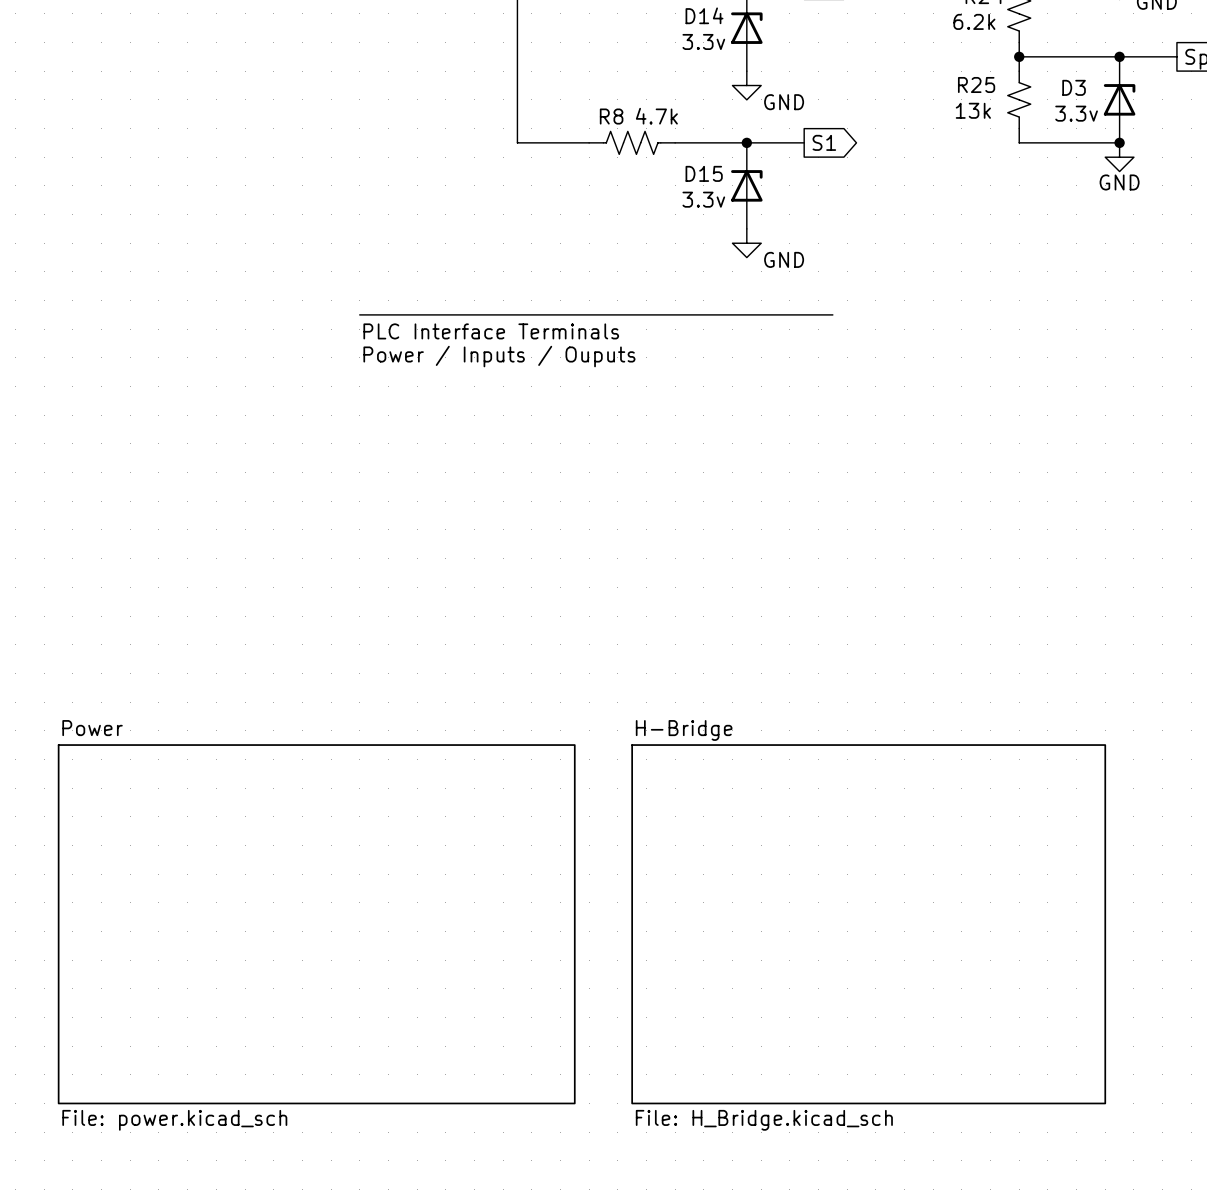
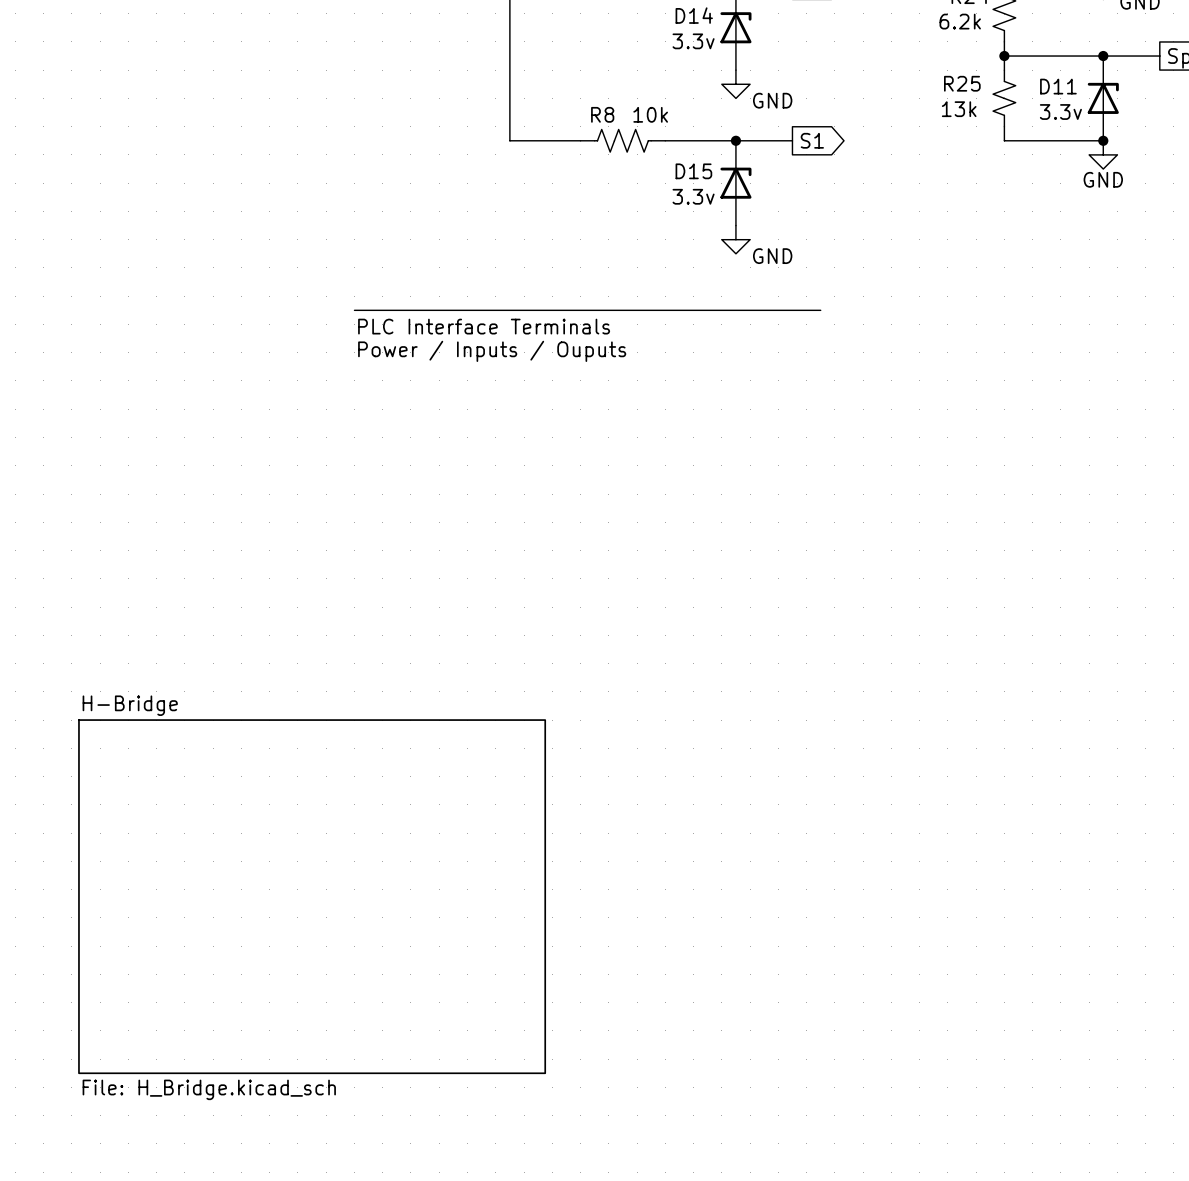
D3 name: D3 (1074, 87) -> D11 (1058, 86)
R8 value: 4.7k (656, 116) -> 10k (650, 114)
sheet H-Bridge: none -> File: H_Bridge.kicad_sch (312, 896)
sheet Power: File: power.kicad_sch (316, 924) -> none
sheet H-Bridge: File: H_Bridge.kicad_sch (868, 924) -> none

